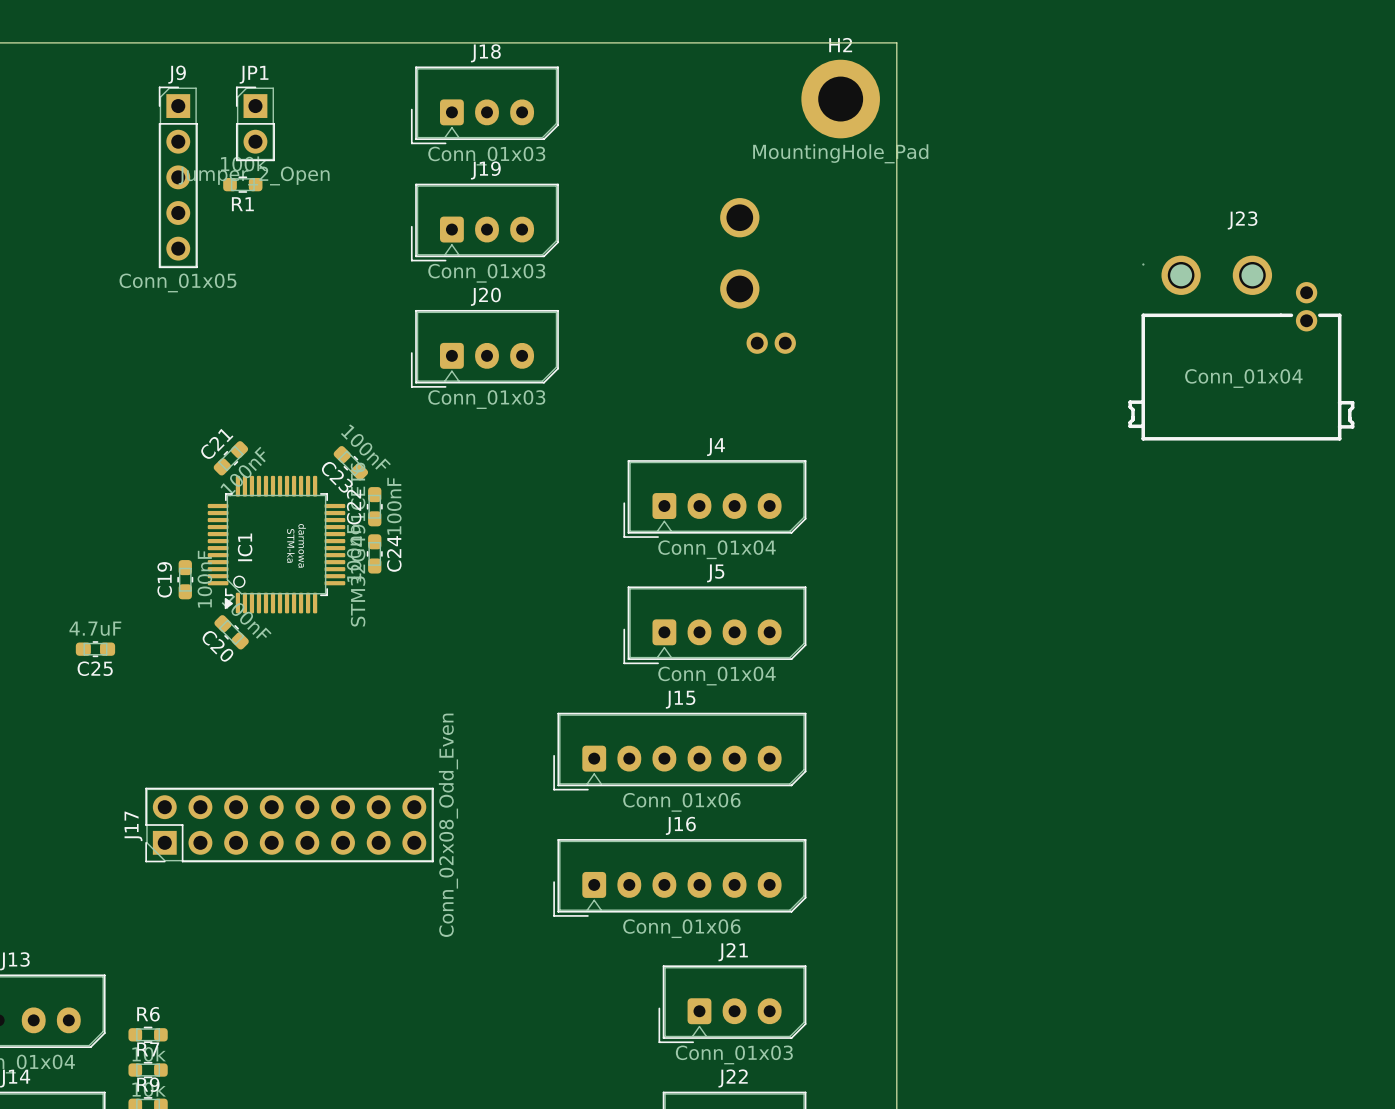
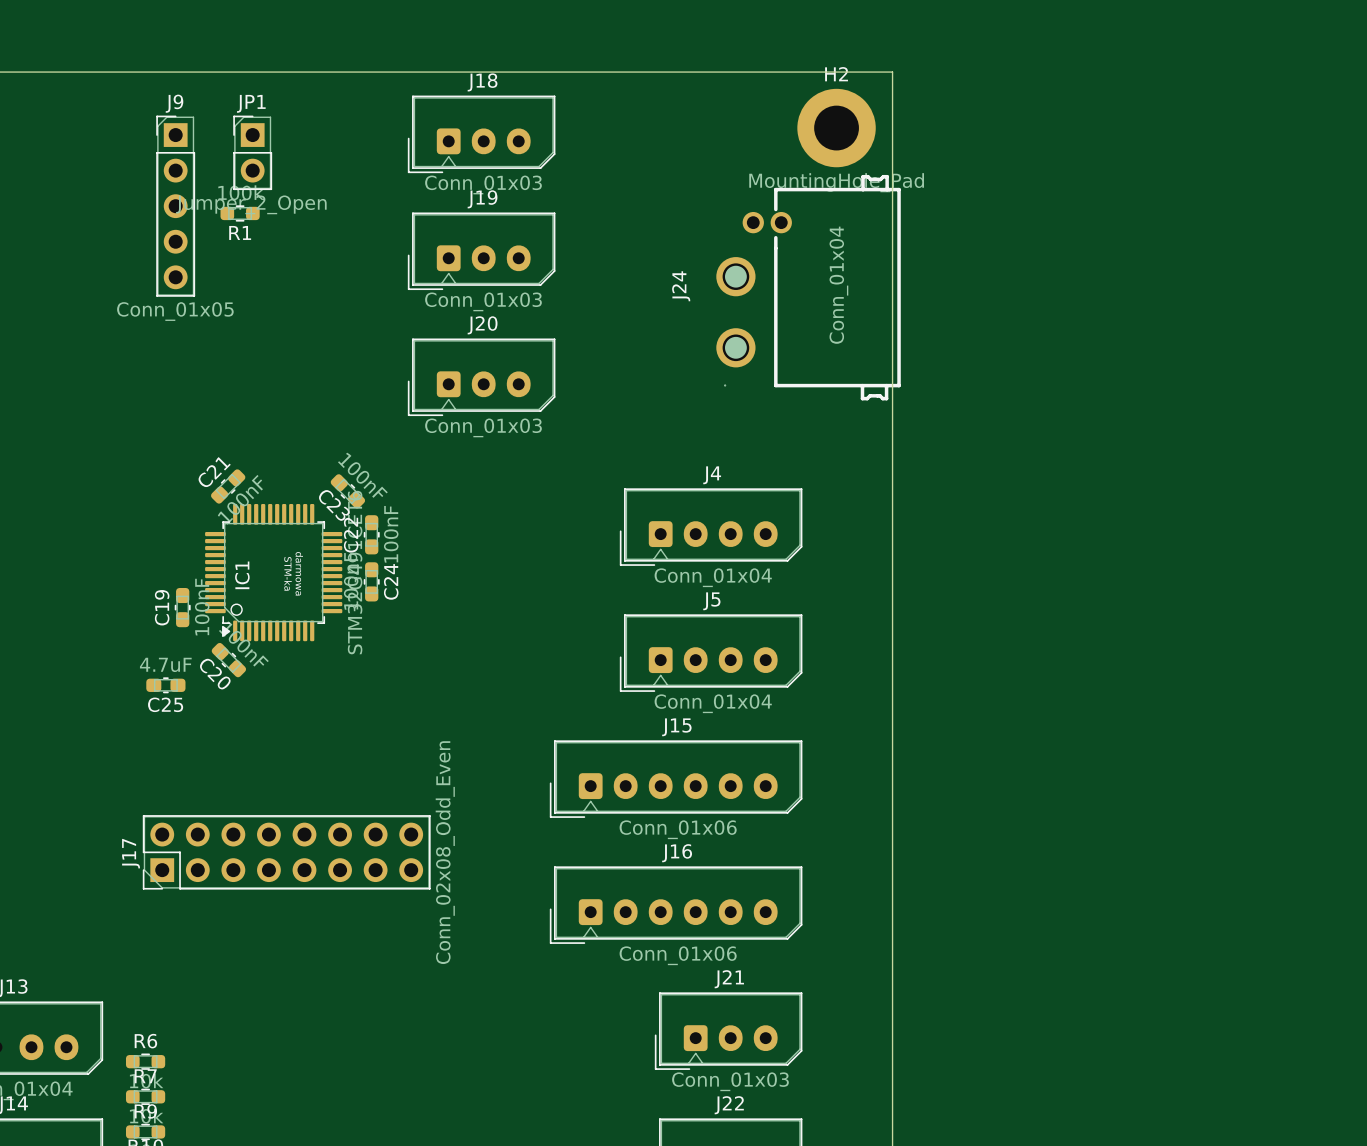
J24 side: bottom (758, 275) -> top (808, 287)
J23: Conn_01x04 (1241, 348) -> none
C25 position: (95, 649) -> (165, 685)

